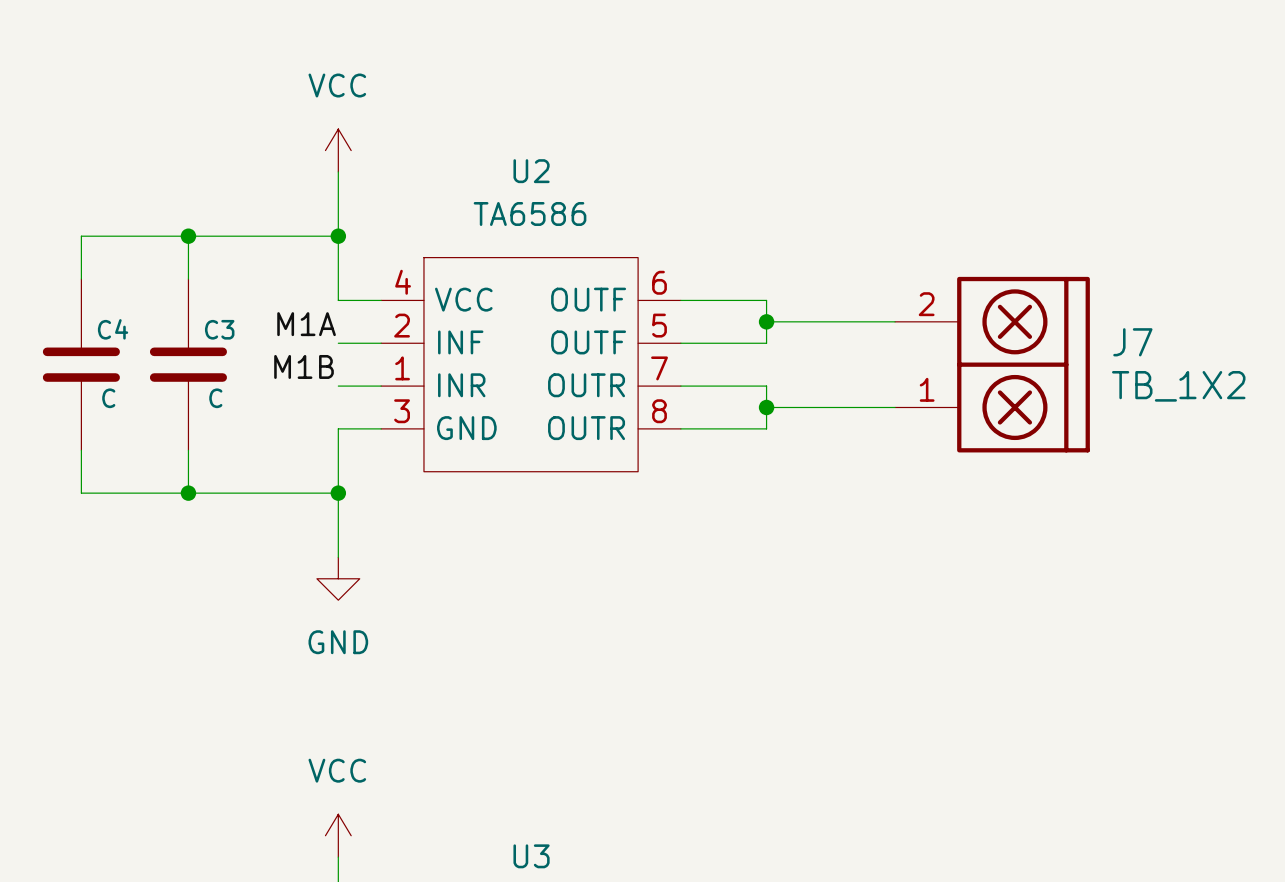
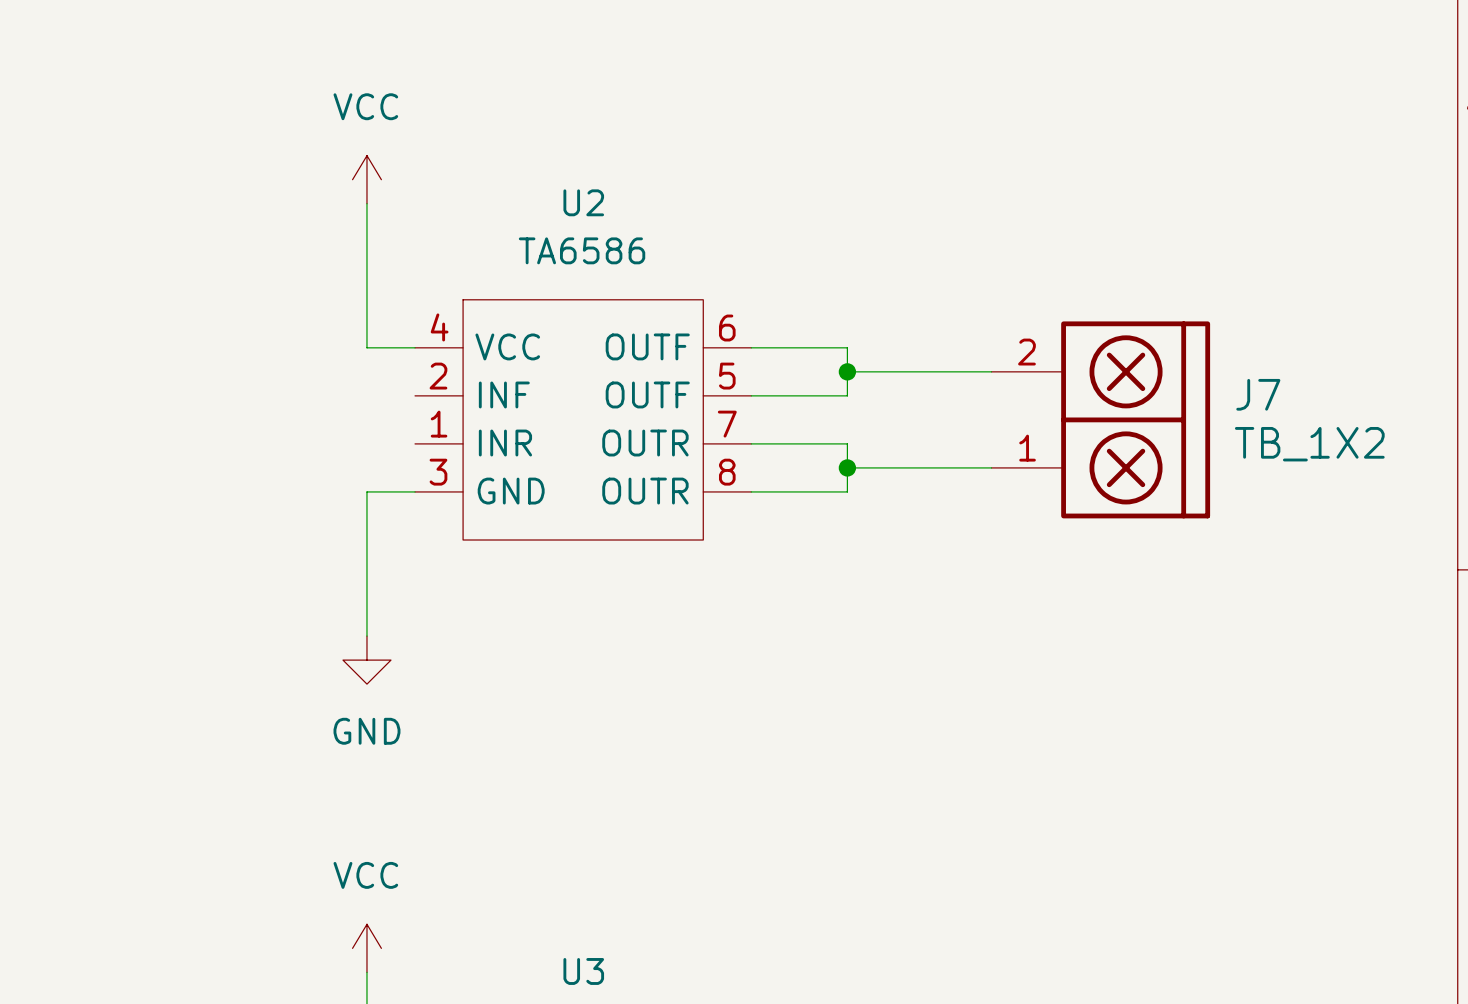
wire: (188, 236) (188, 279) -> none
junction: (188, 236) -> none
wire: (338, 236) (81, 236) (81, 279) -> none
junction: (338, 236) -> none
label: M1A (306, 324) -> none
wire: (338, 343) (381, 343) -> none
C4: C (81, 364) -> none
C3: C (188, 364) -> none
label: M1B (304, 366) -> none
wire: (338, 386) (381, 386) -> none
wire: (81, 450) (81, 493) (338, 493) -> none
wire: (188, 450) (188, 493) -> none
junction: (188, 493) -> none
junction: (338, 493) -> none

